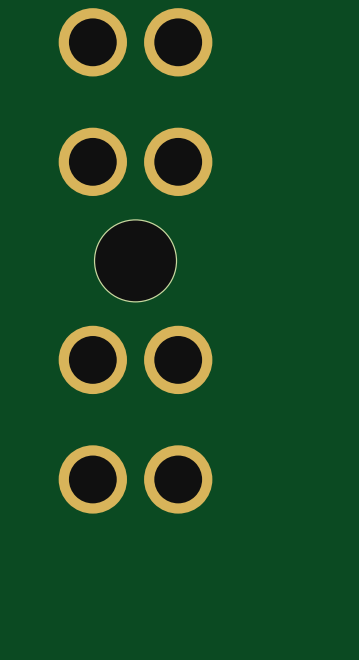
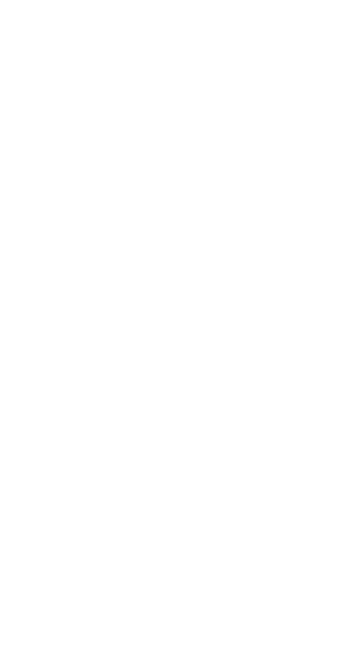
part: (135, 260) -> none

